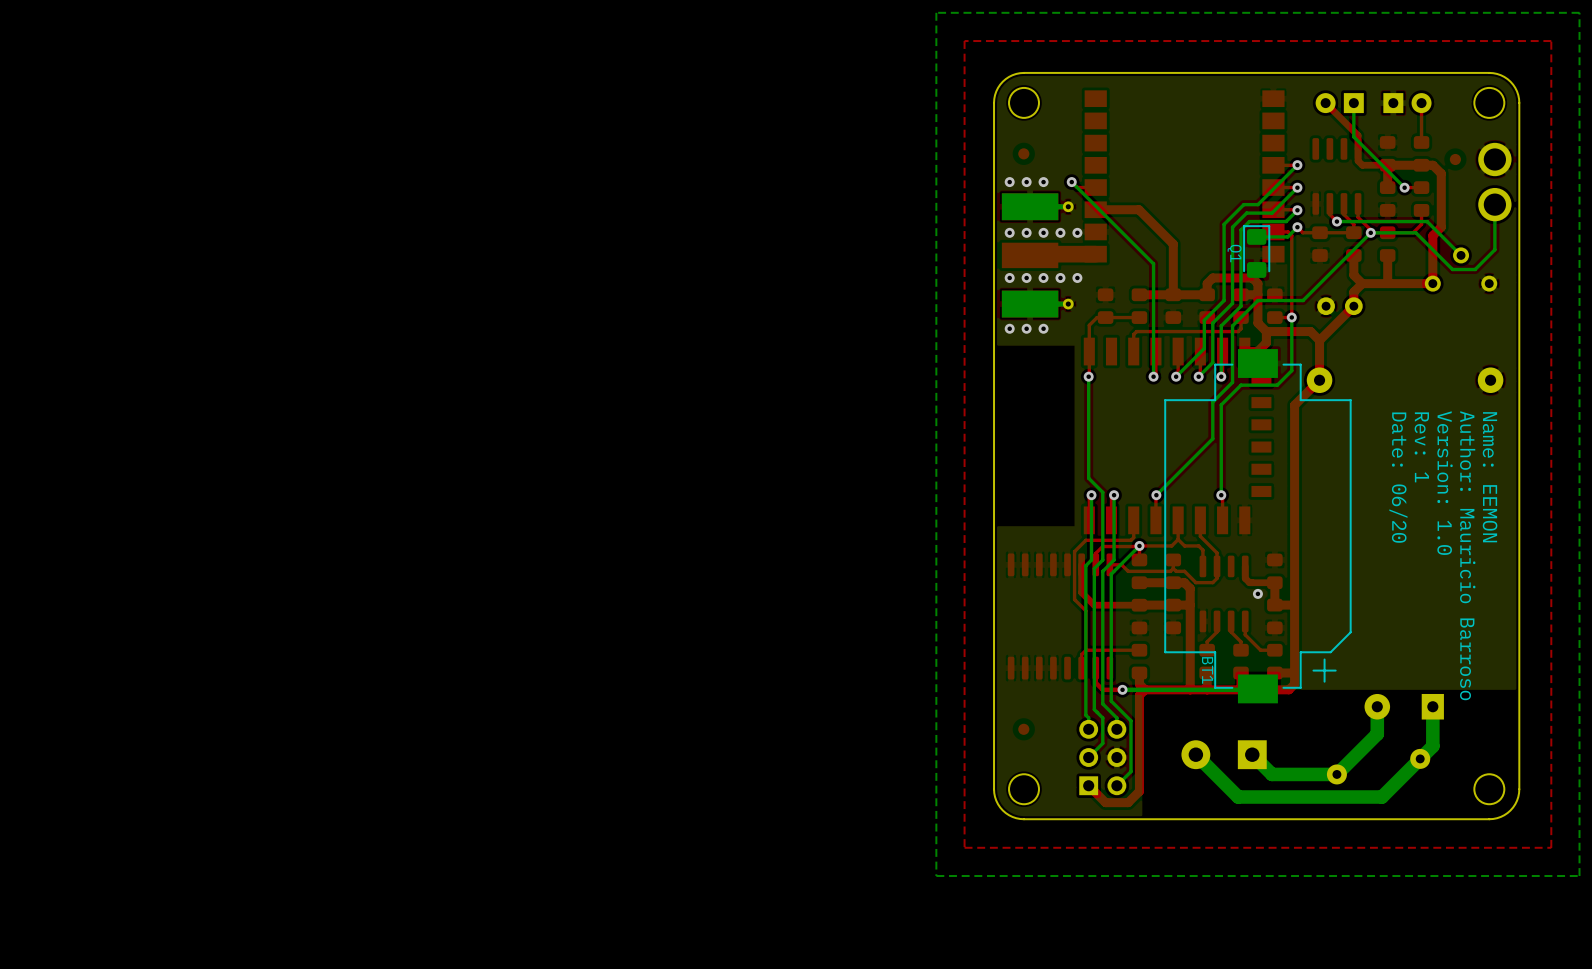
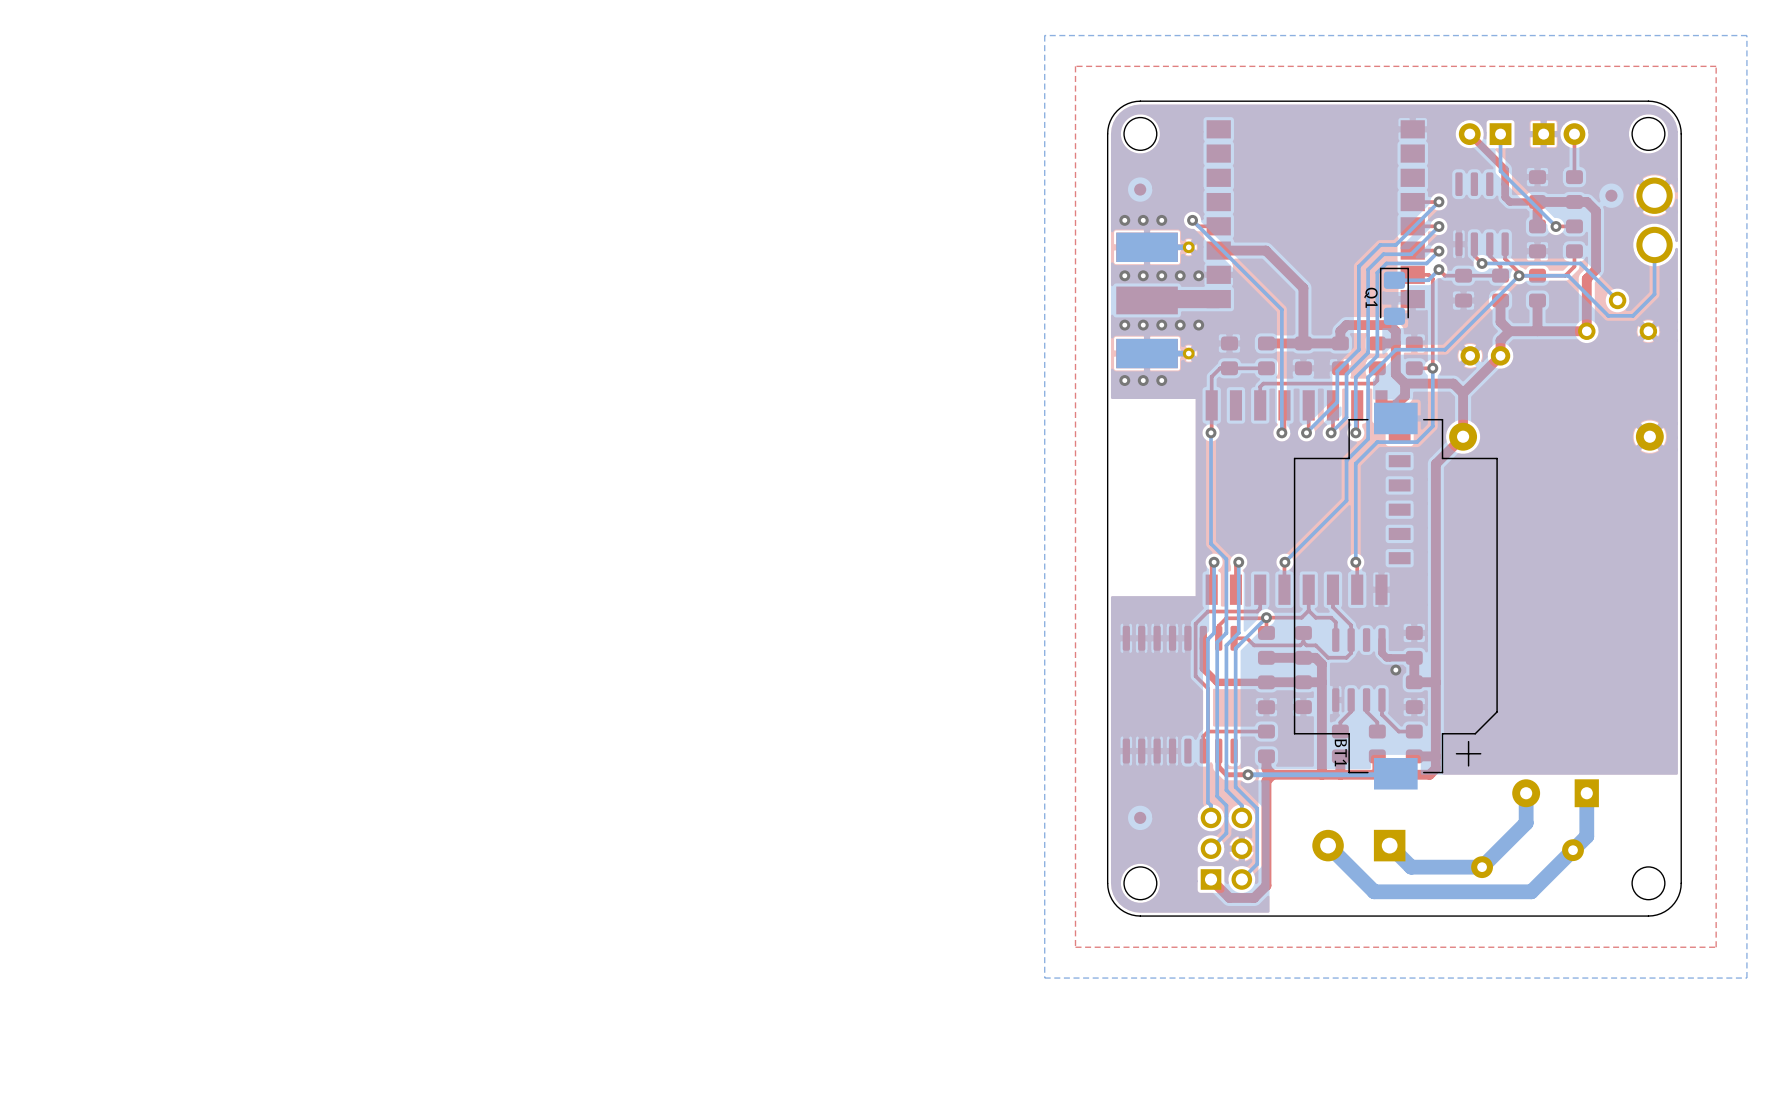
text: Rev: 1 (1421, 447) -> none
text: Date: 06/20 (1398, 477) -> none
text: Name: EEMON (1490, 477) -> none
text: Version: 1.0 (1445, 483) -> none
text: Author: Mauricio Barroso (1467, 555) -> none

